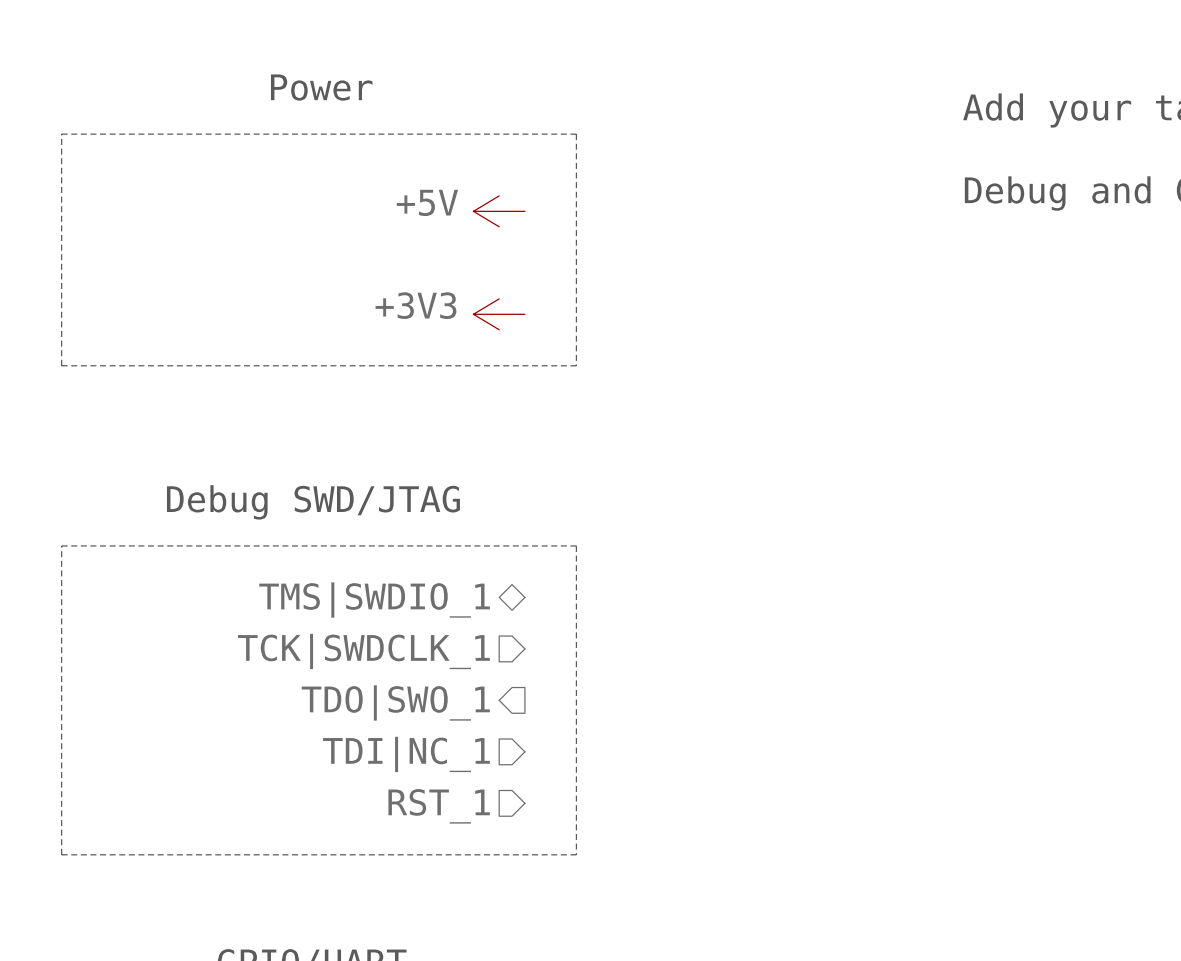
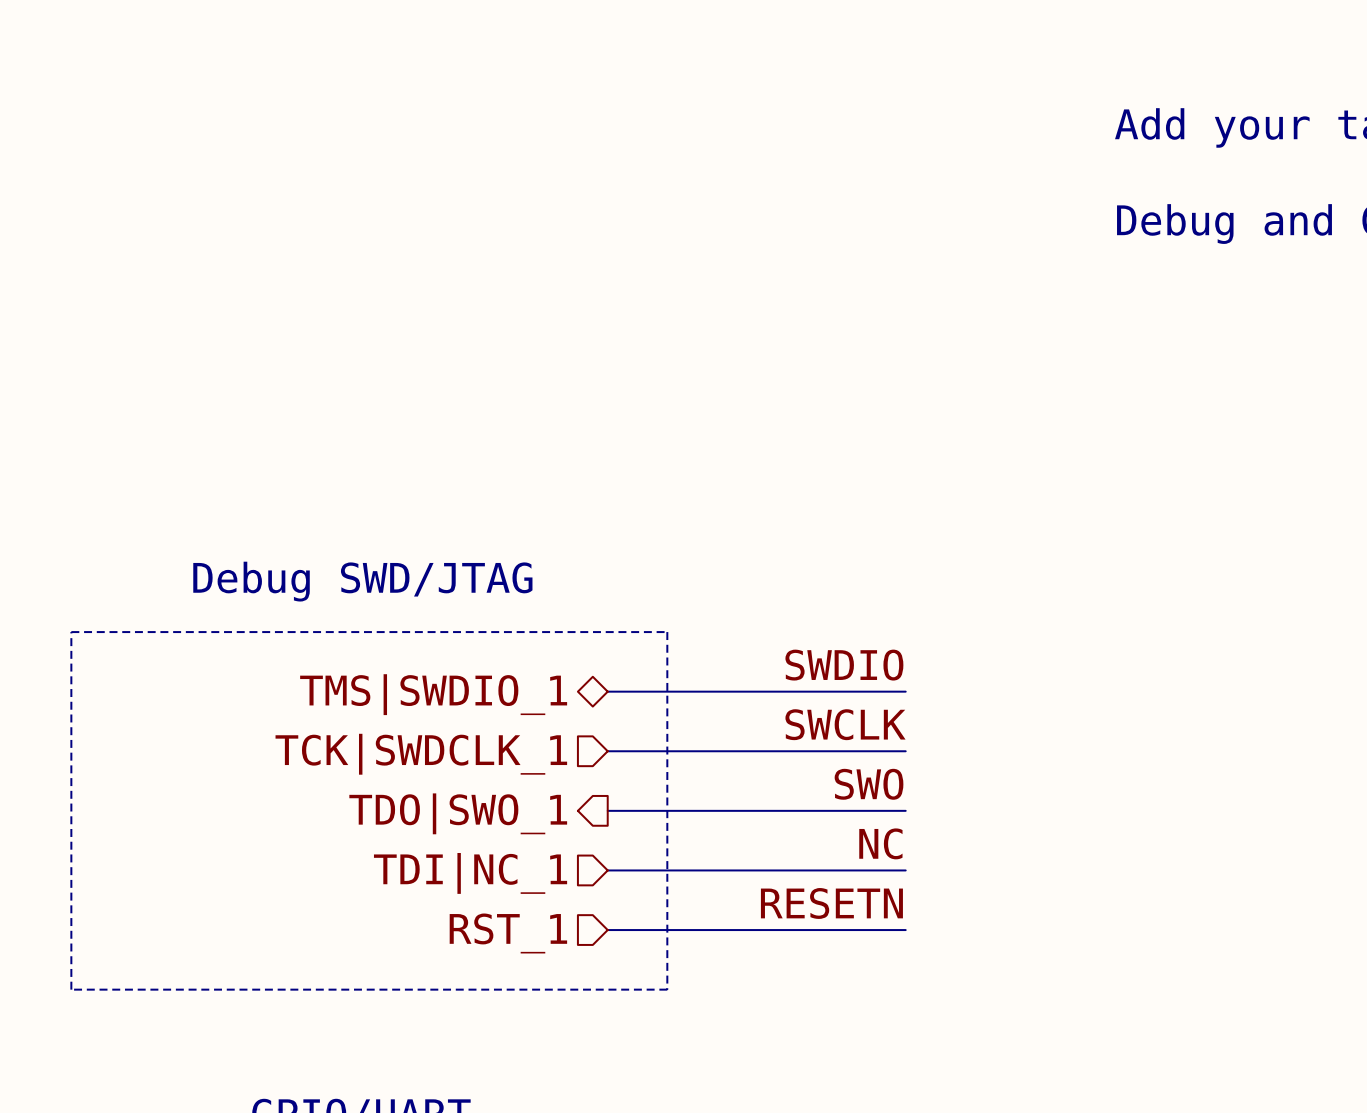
text: Power (321, 87) -> none
line: (61, 134) (61, 365) (576, 365) (576, 134) (61, 134) -> none
power symbol: +5V (499, 211) -> none
power symbol: +3V3 (499, 314) -> none
label: none -> SWDIO (844, 665)
wire: none -> (607, 691) (905, 691)
label: none -> SWCLK (845, 724)
wire: none -> (607, 751) (905, 751)
label: none -> SWO (869, 784)
wire: none -> (607, 810) (905, 810)
label: none -> NC (880, 843)
wire: none -> (607, 870) (905, 870)
label: none -> RESETN (831, 903)
wire: none -> (607, 930) (905, 930)

